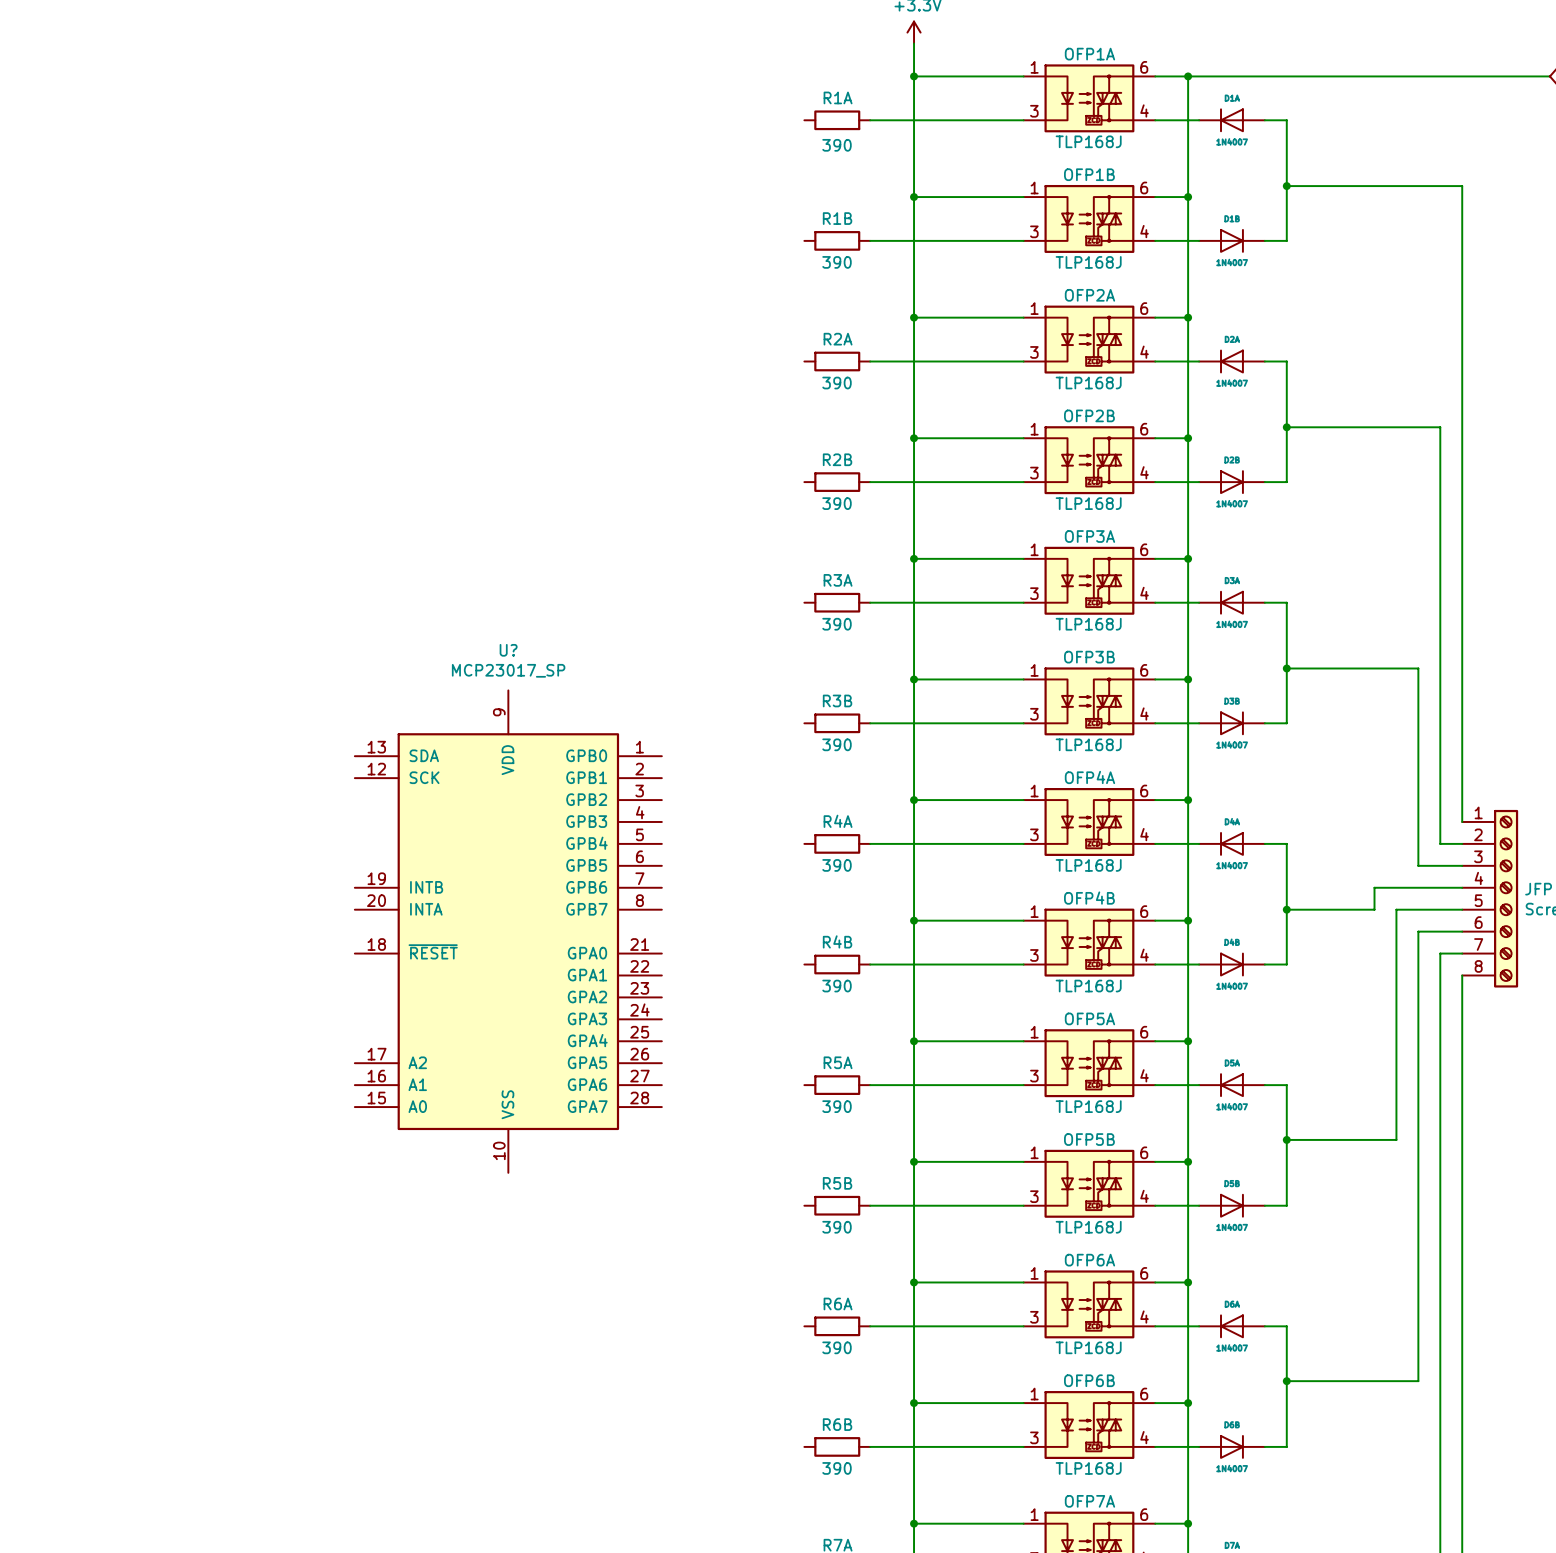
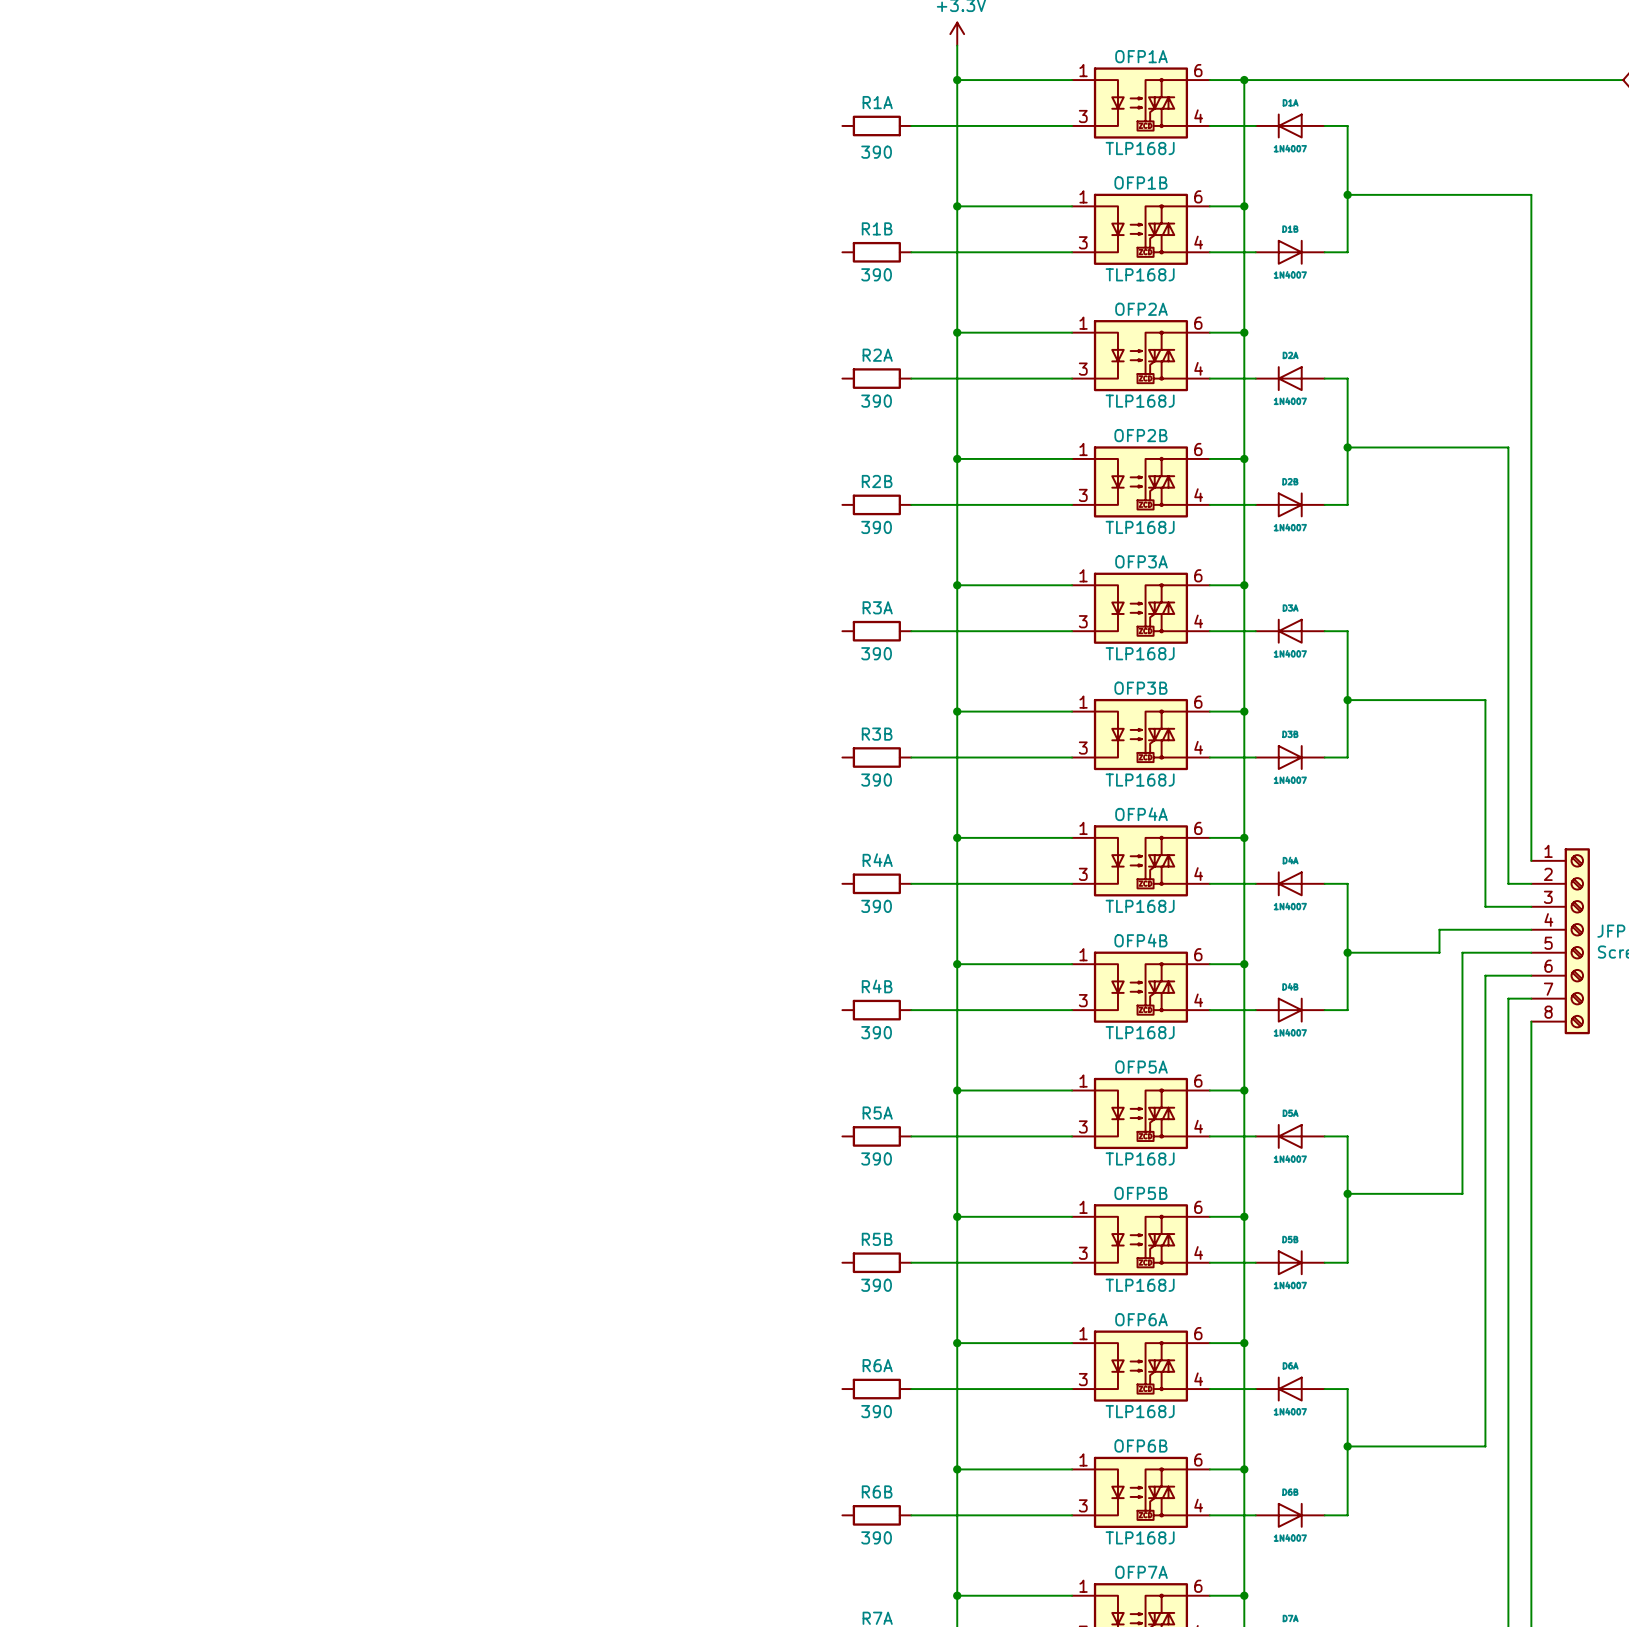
U?: MCP23017_SP (508, 931) -> none

